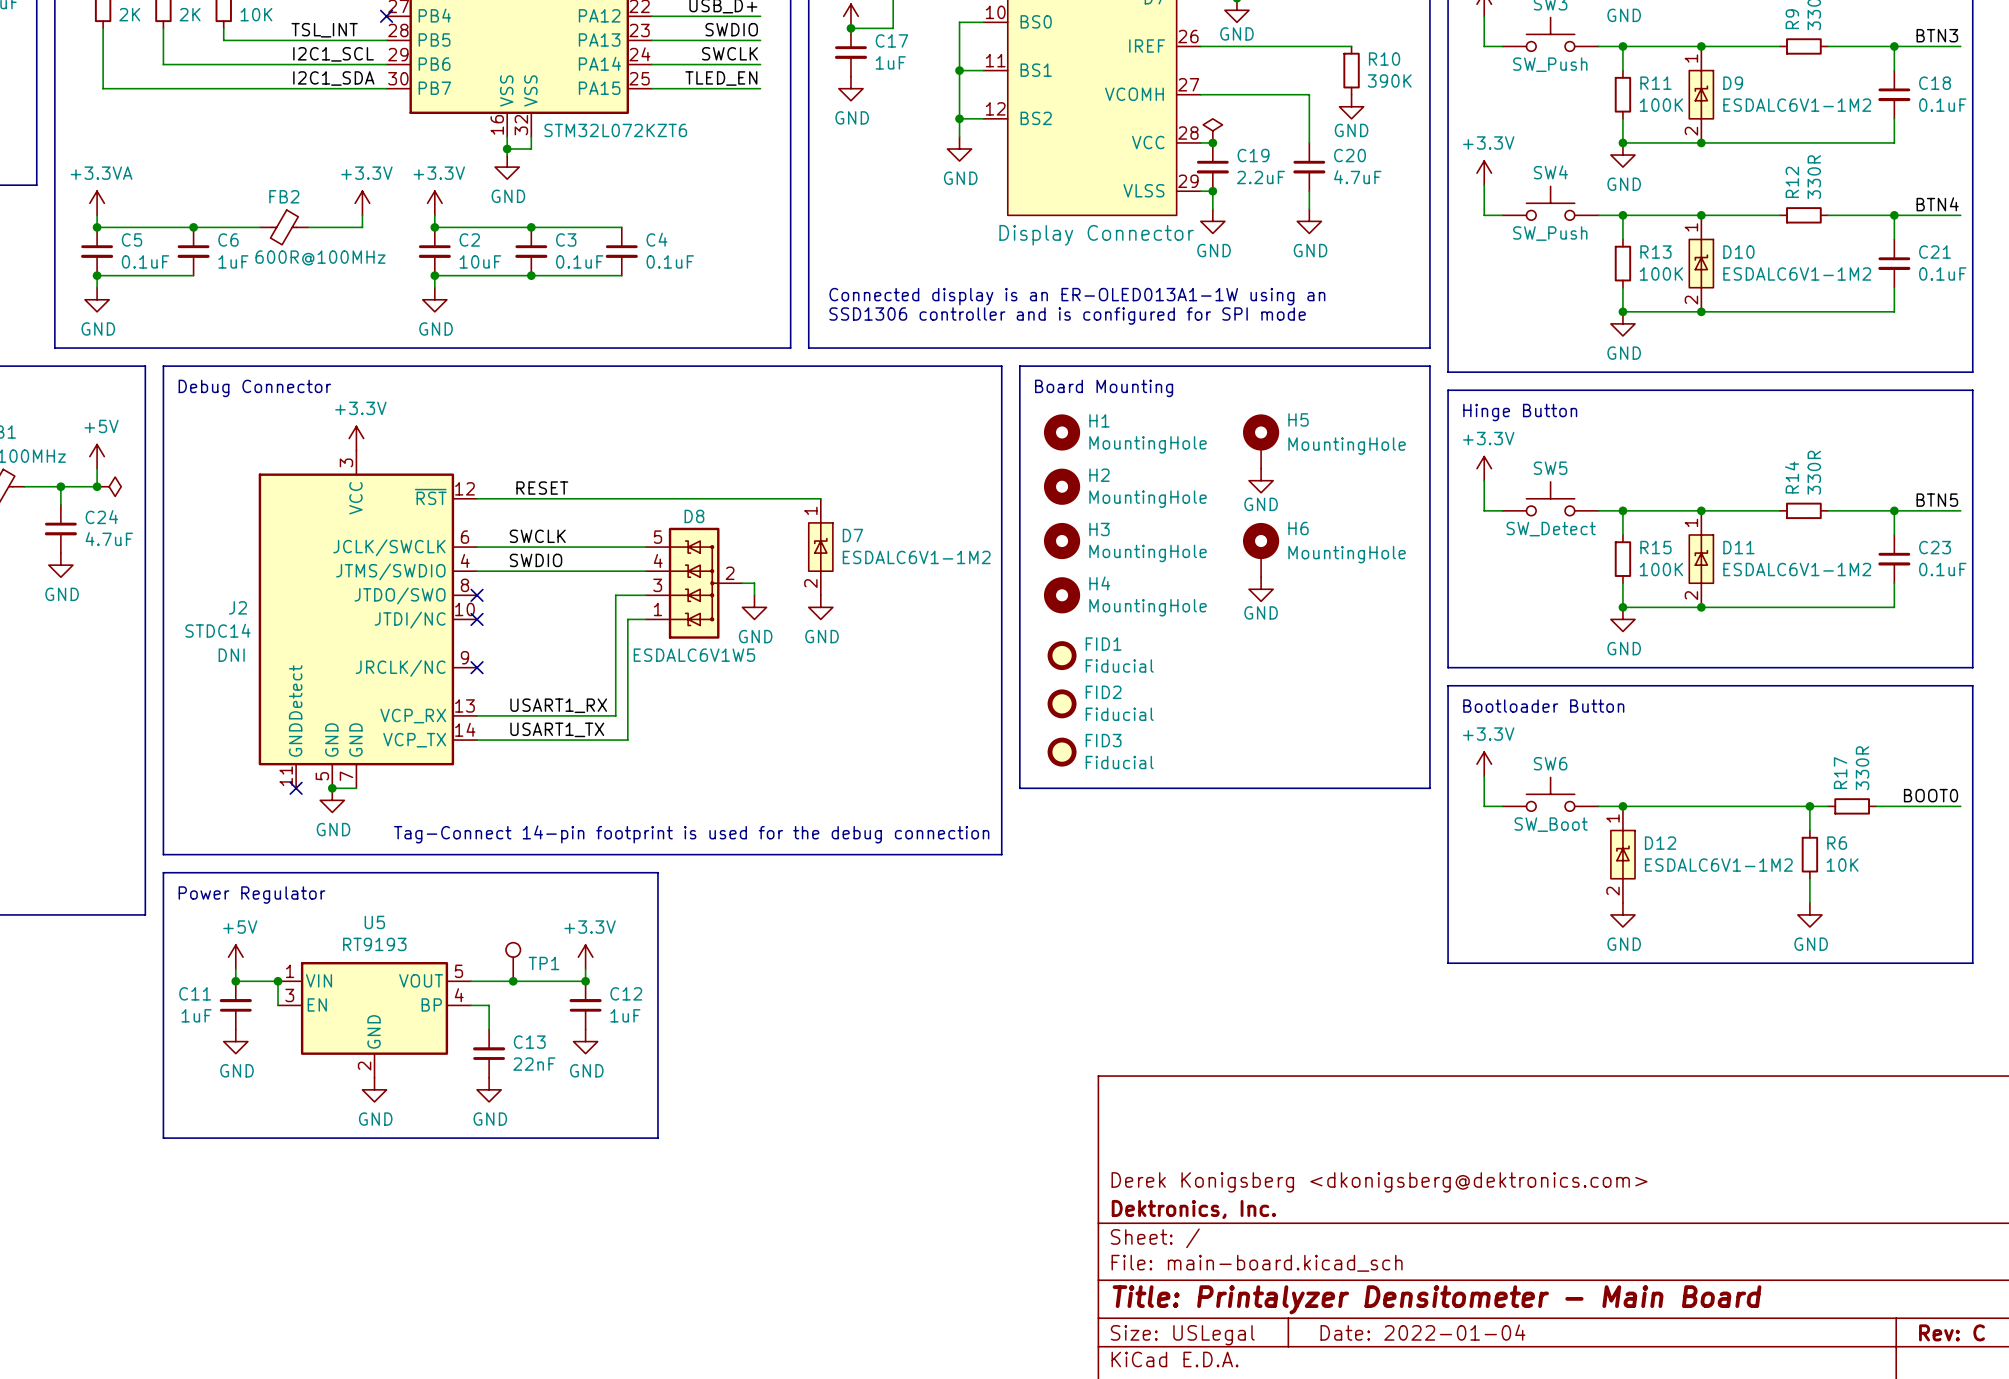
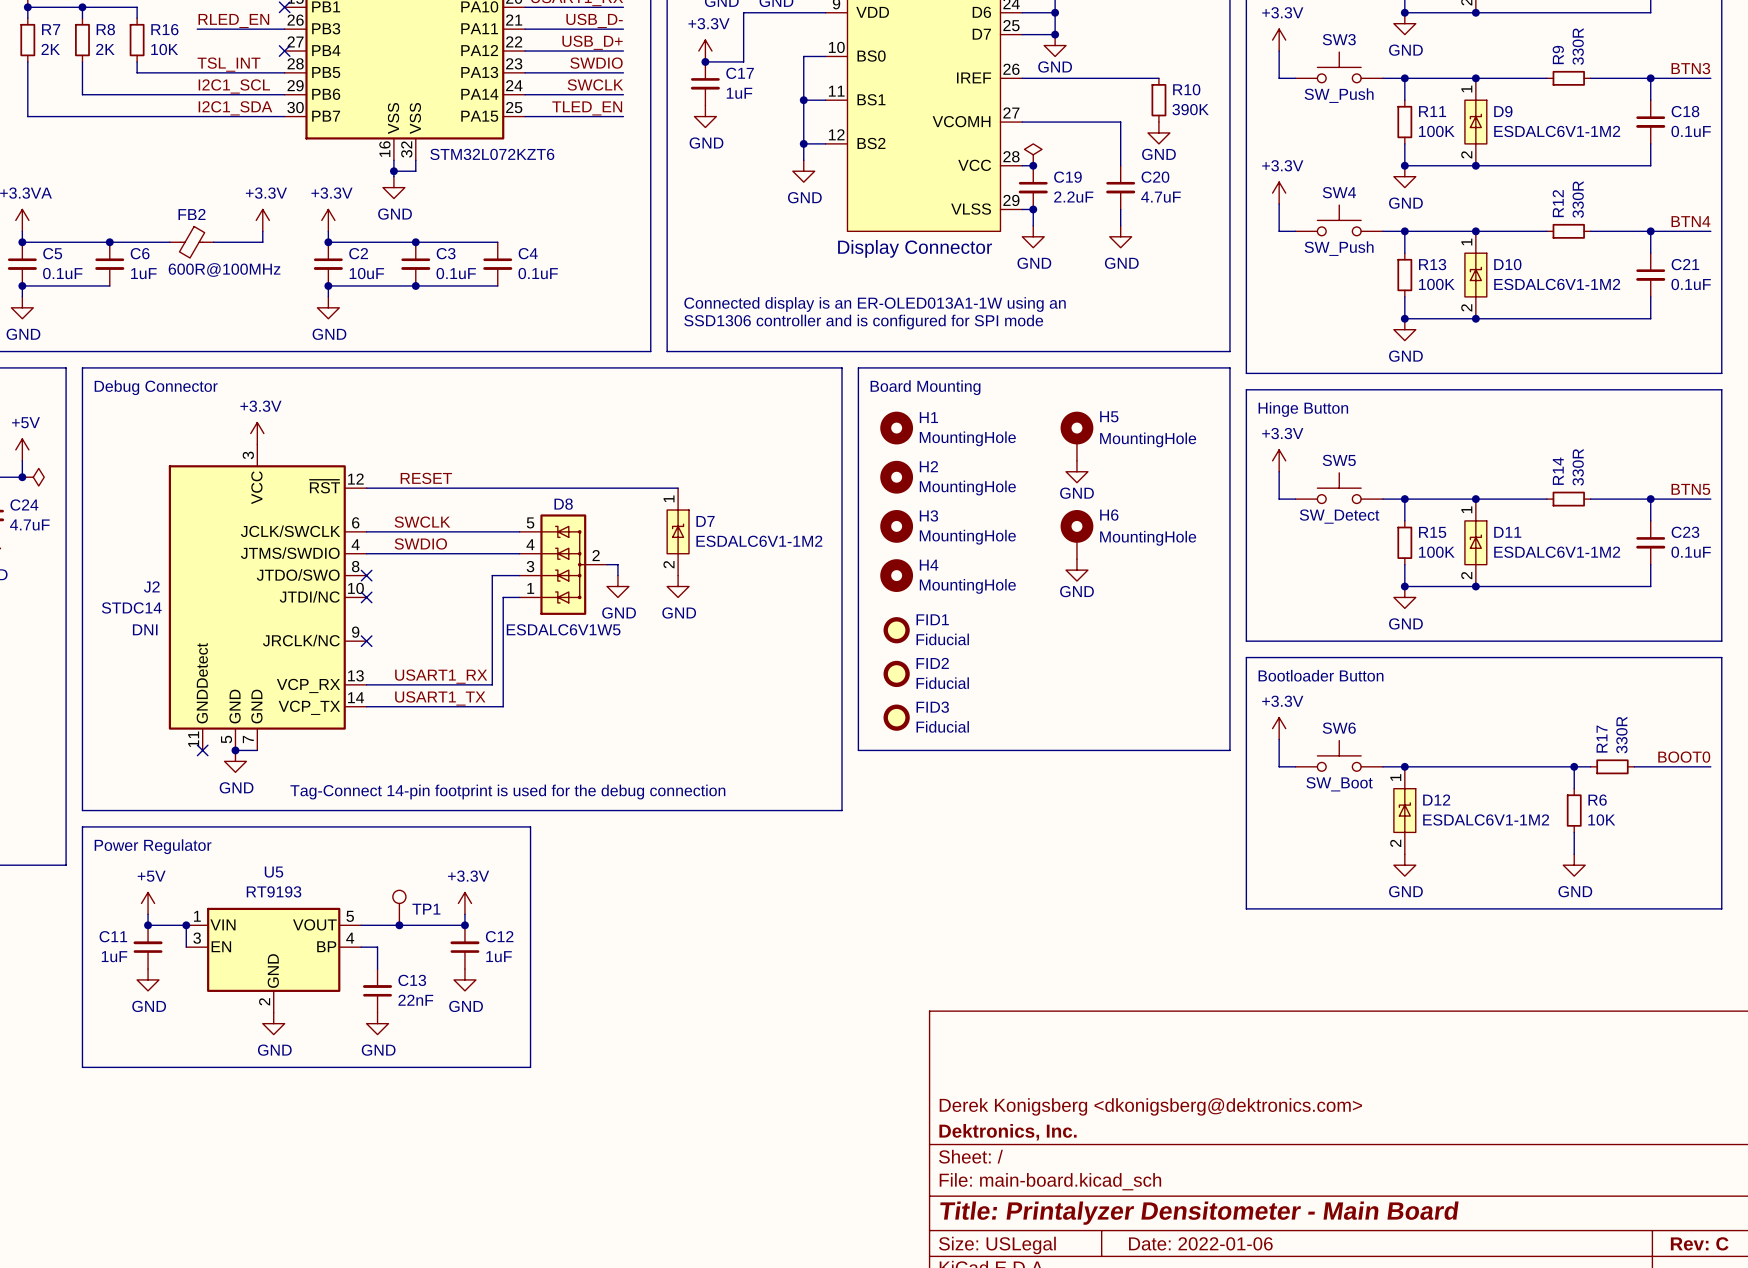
title block: Date: 2022-01-04 (1422, 1332) -> Date: 2022-01-06 (1200, 1243)

